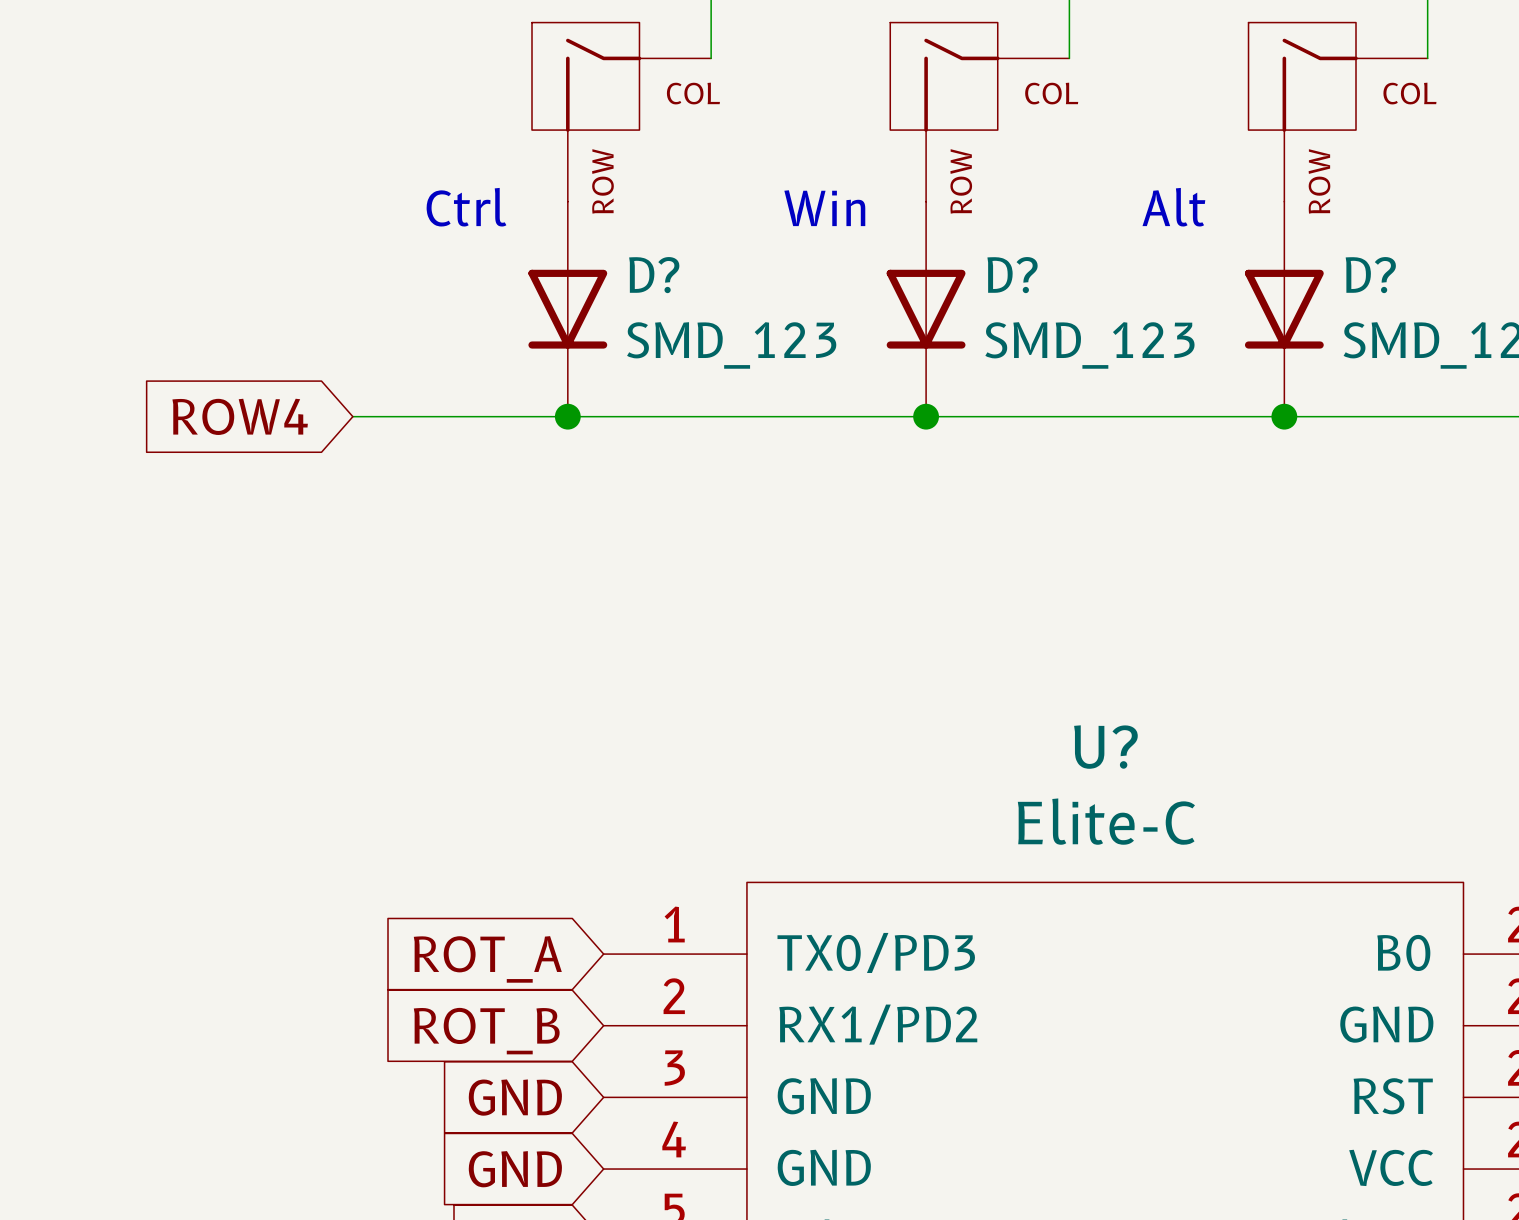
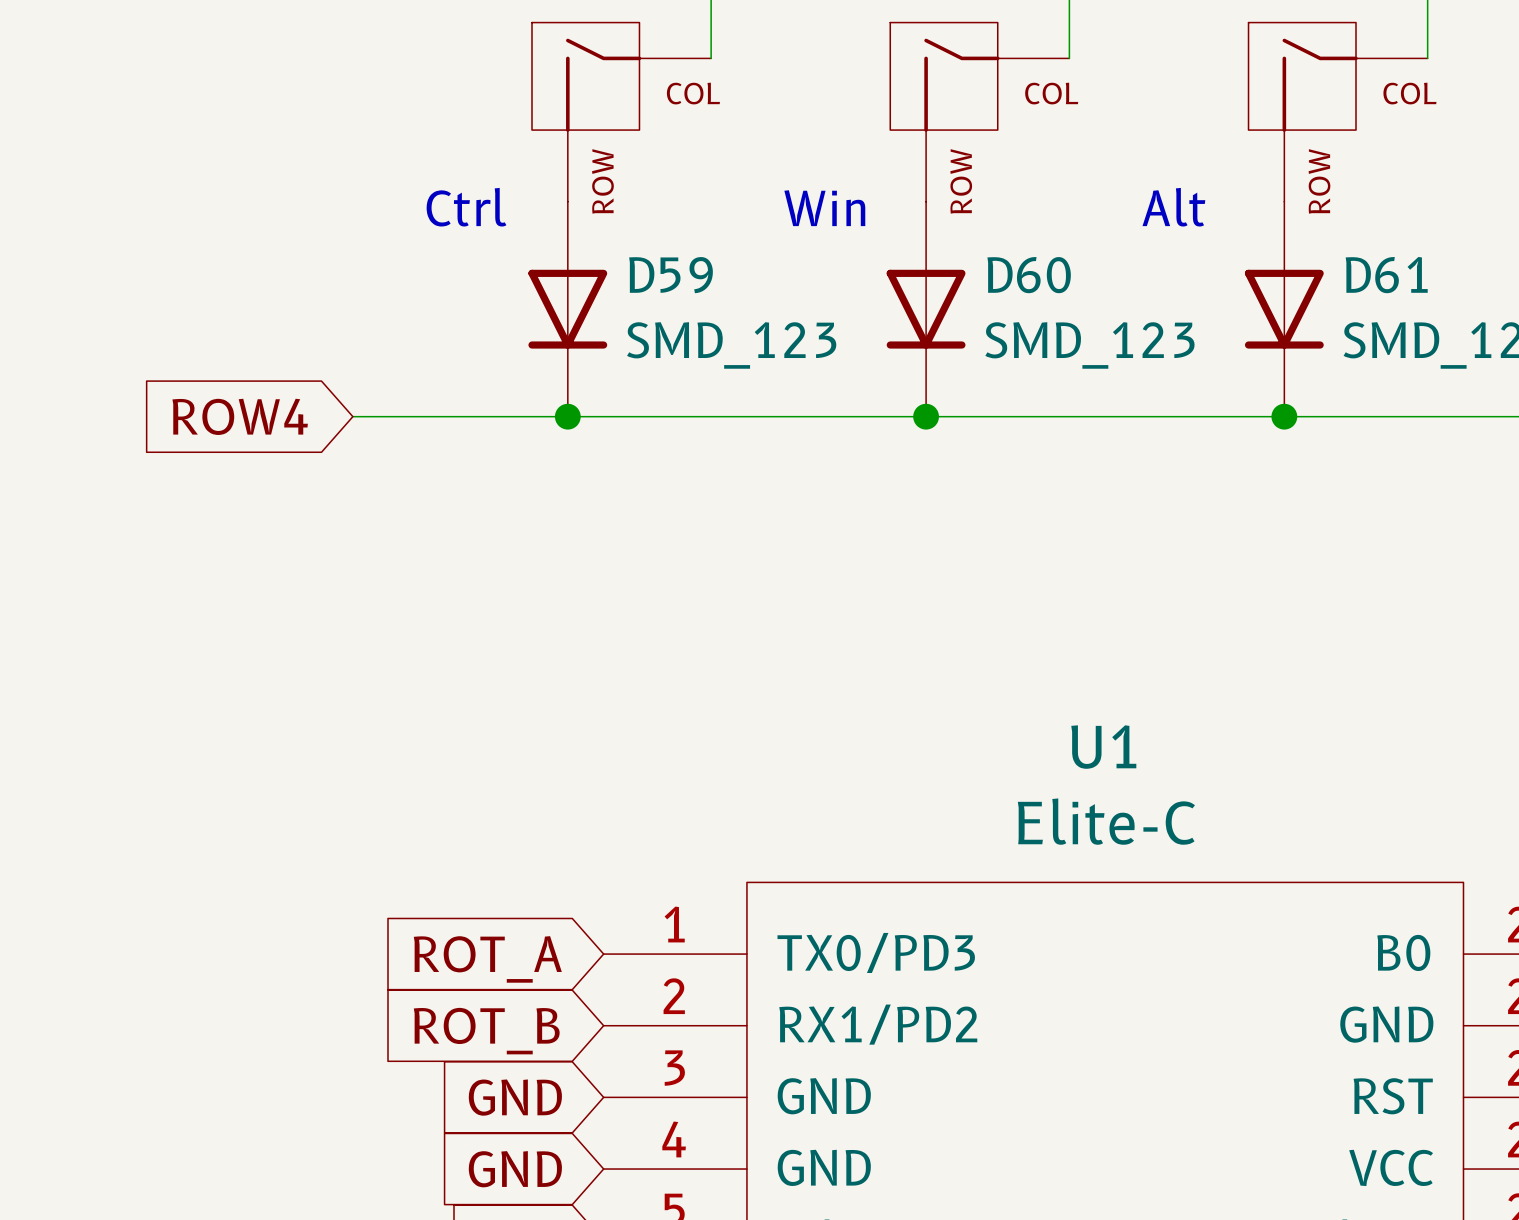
D? name: D? (654, 275) -> D59 (671, 275)
D? name: D? (1012, 275) -> D60 (1029, 275)
D? name: D? (1370, 275) -> D61 (1386, 275)
U? name: U? (1105, 747) -> U1 (1103, 747)

